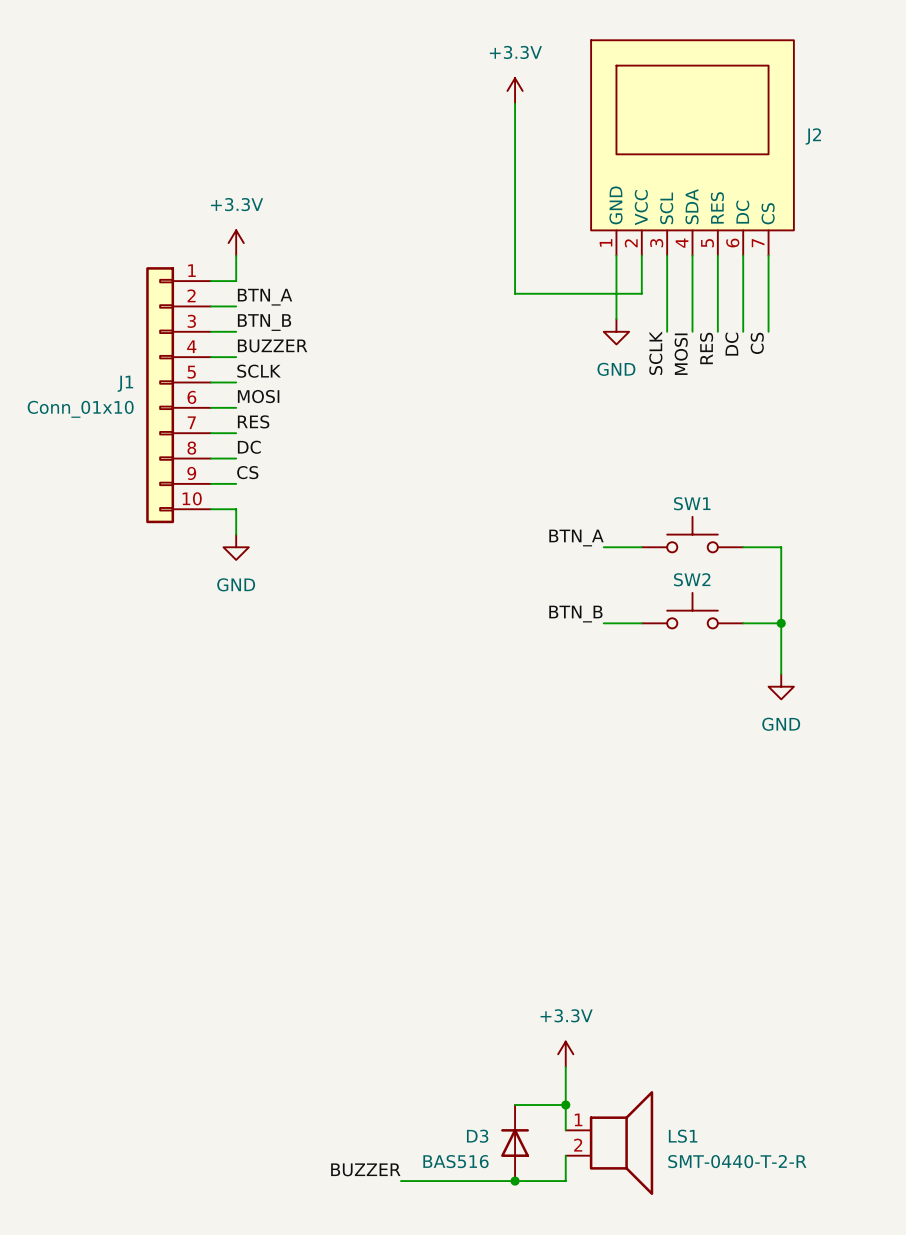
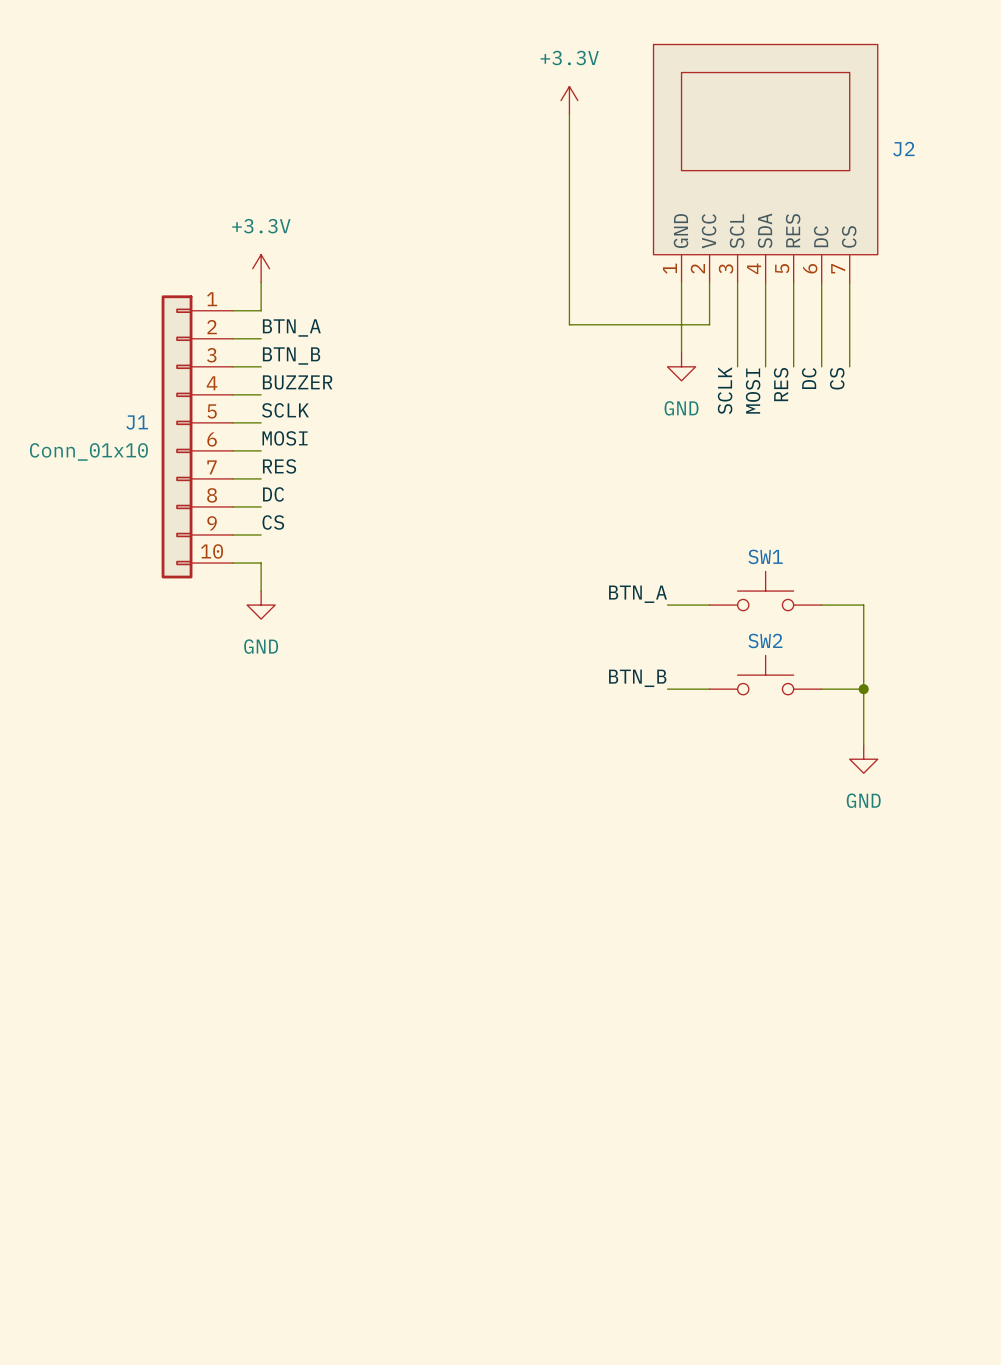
power symbol: +3.3V (565, 1054) -> none
wire: (565, 1066) (565, 1130) -> none
wire: (515, 1105) (565, 1105) -> none
junction: (565, 1105) -> none
D3: BAS516 (515, 1143) -> none
LS1: SMT-0440-T-2-R (609, 1143) -> none
wire: (565, 1155) (565, 1181) (400, 1181) -> none
label: BUZZER (365, 1169) -> none
junction: (515, 1181) -> none

